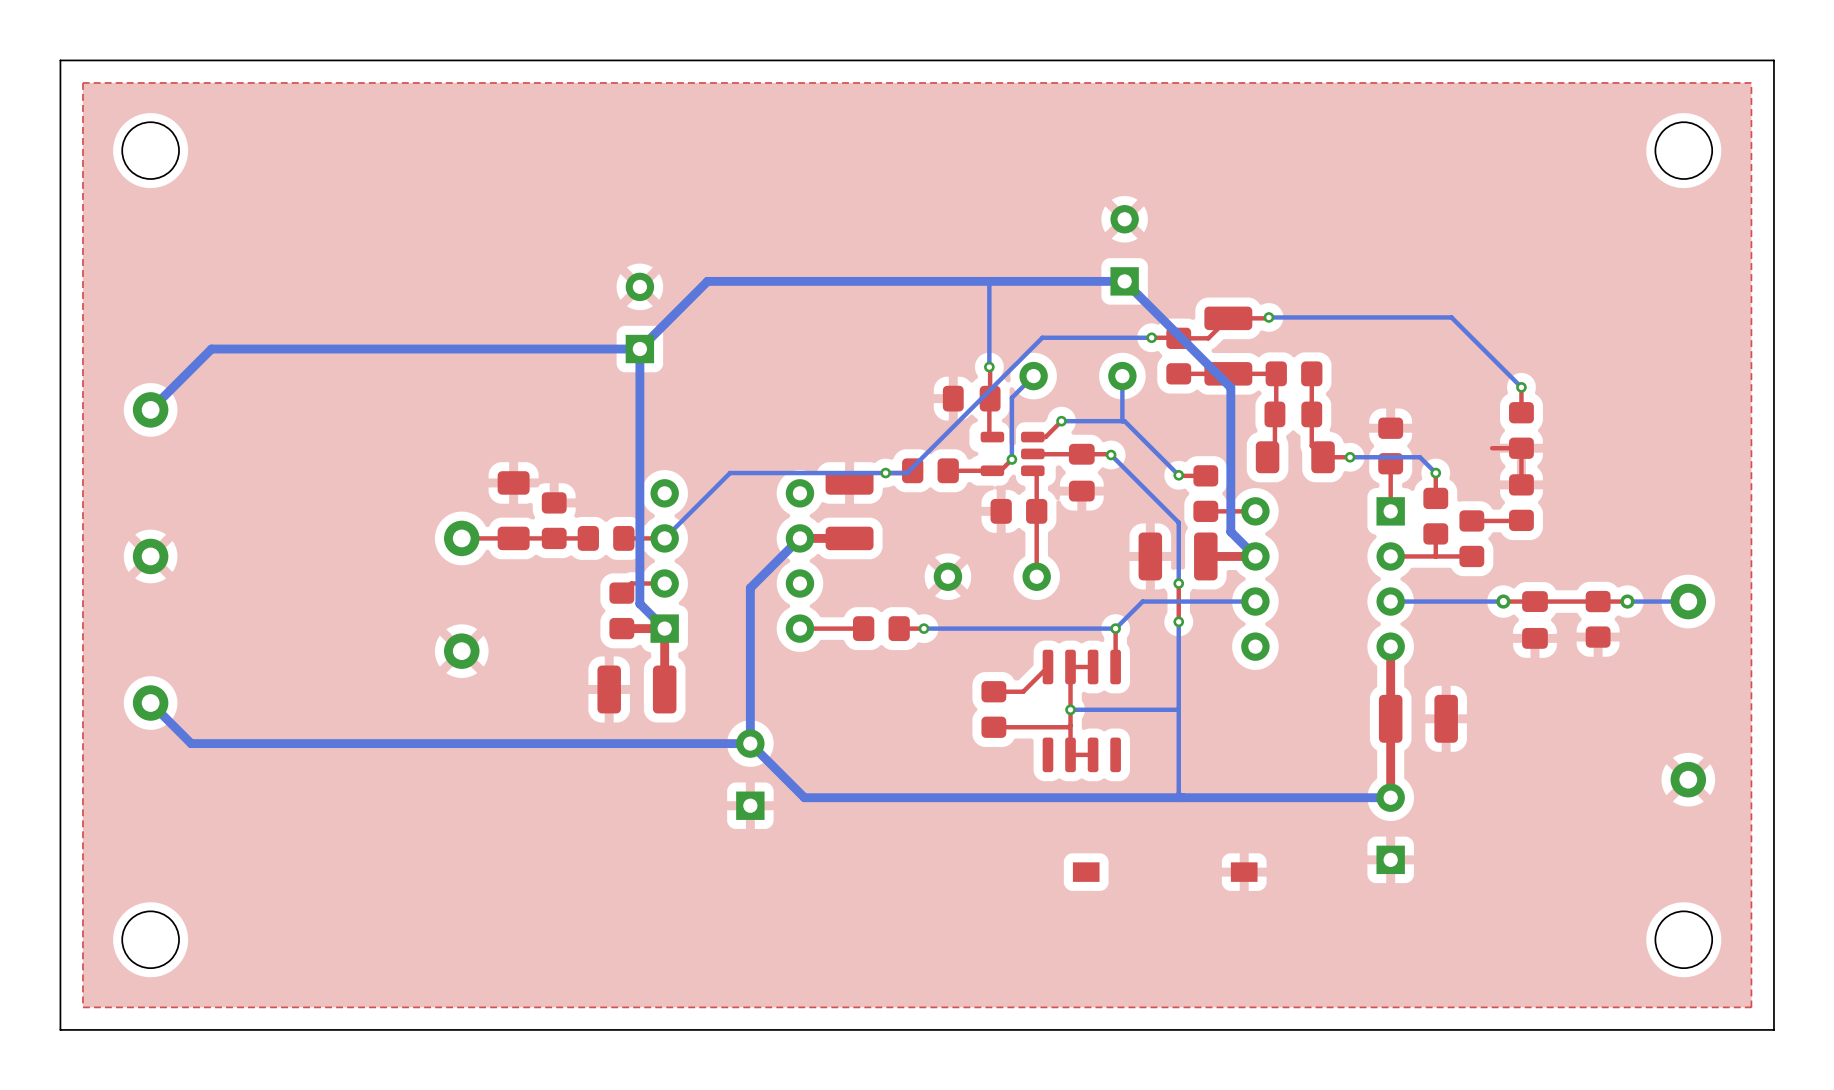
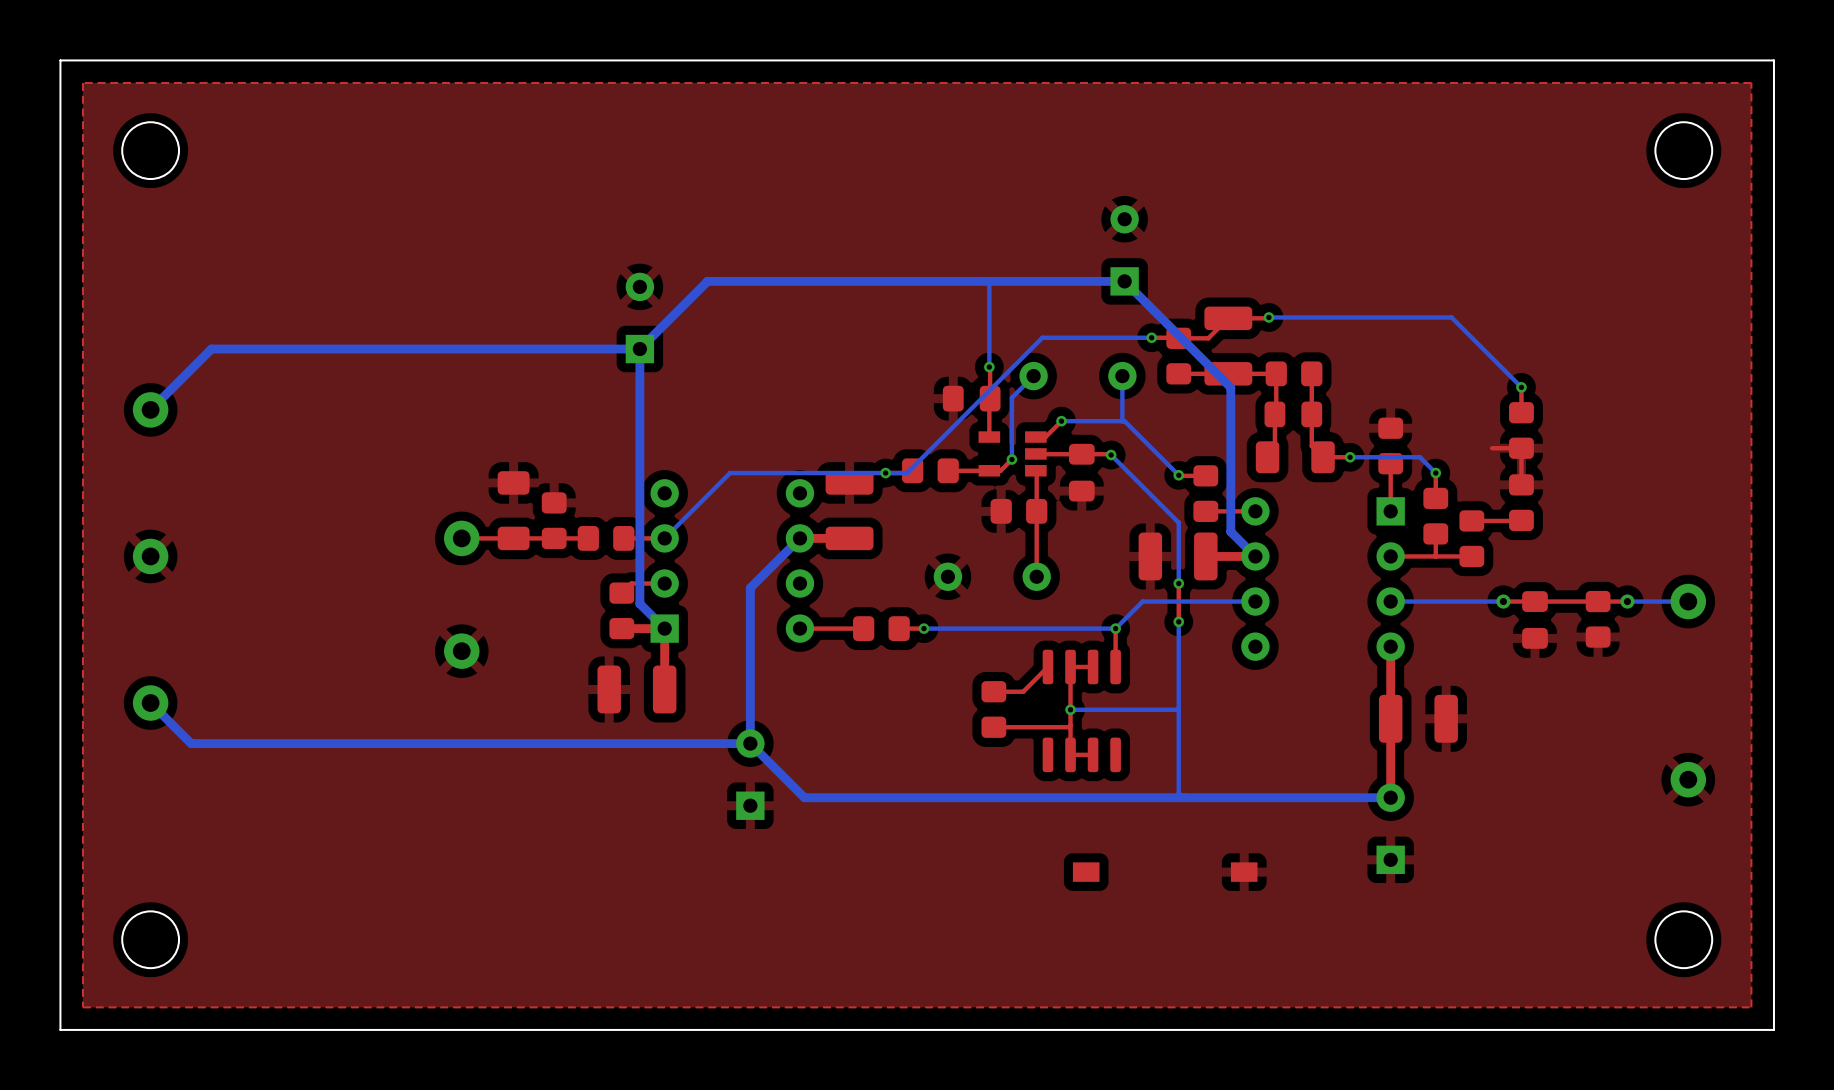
part footprint: [980, 431, 1045, 477] -> [978, 431, 1047, 477]

